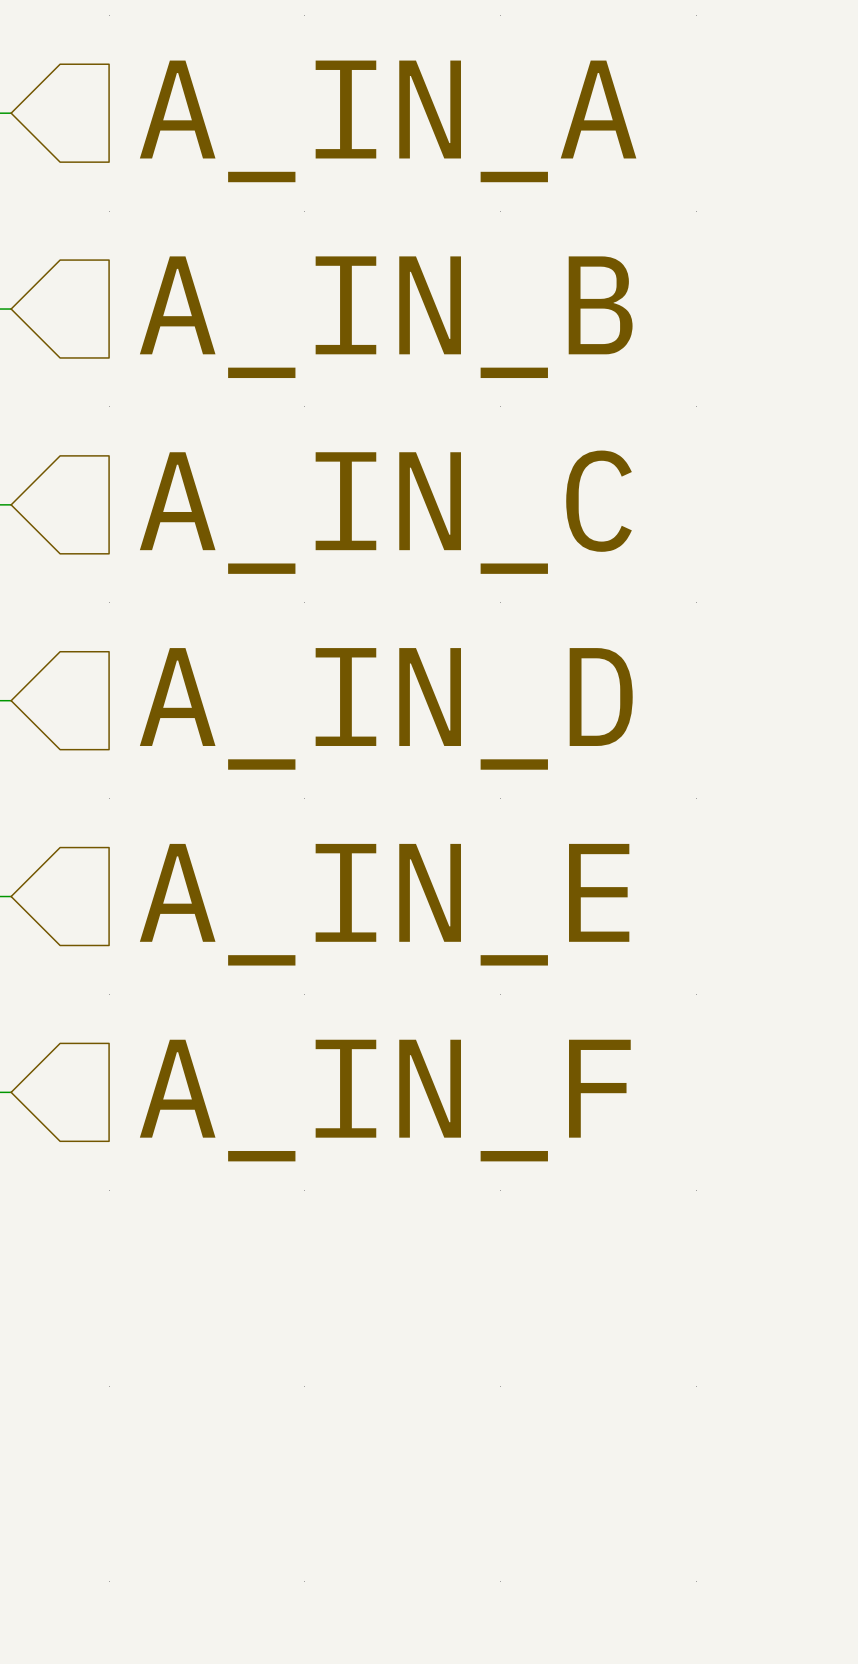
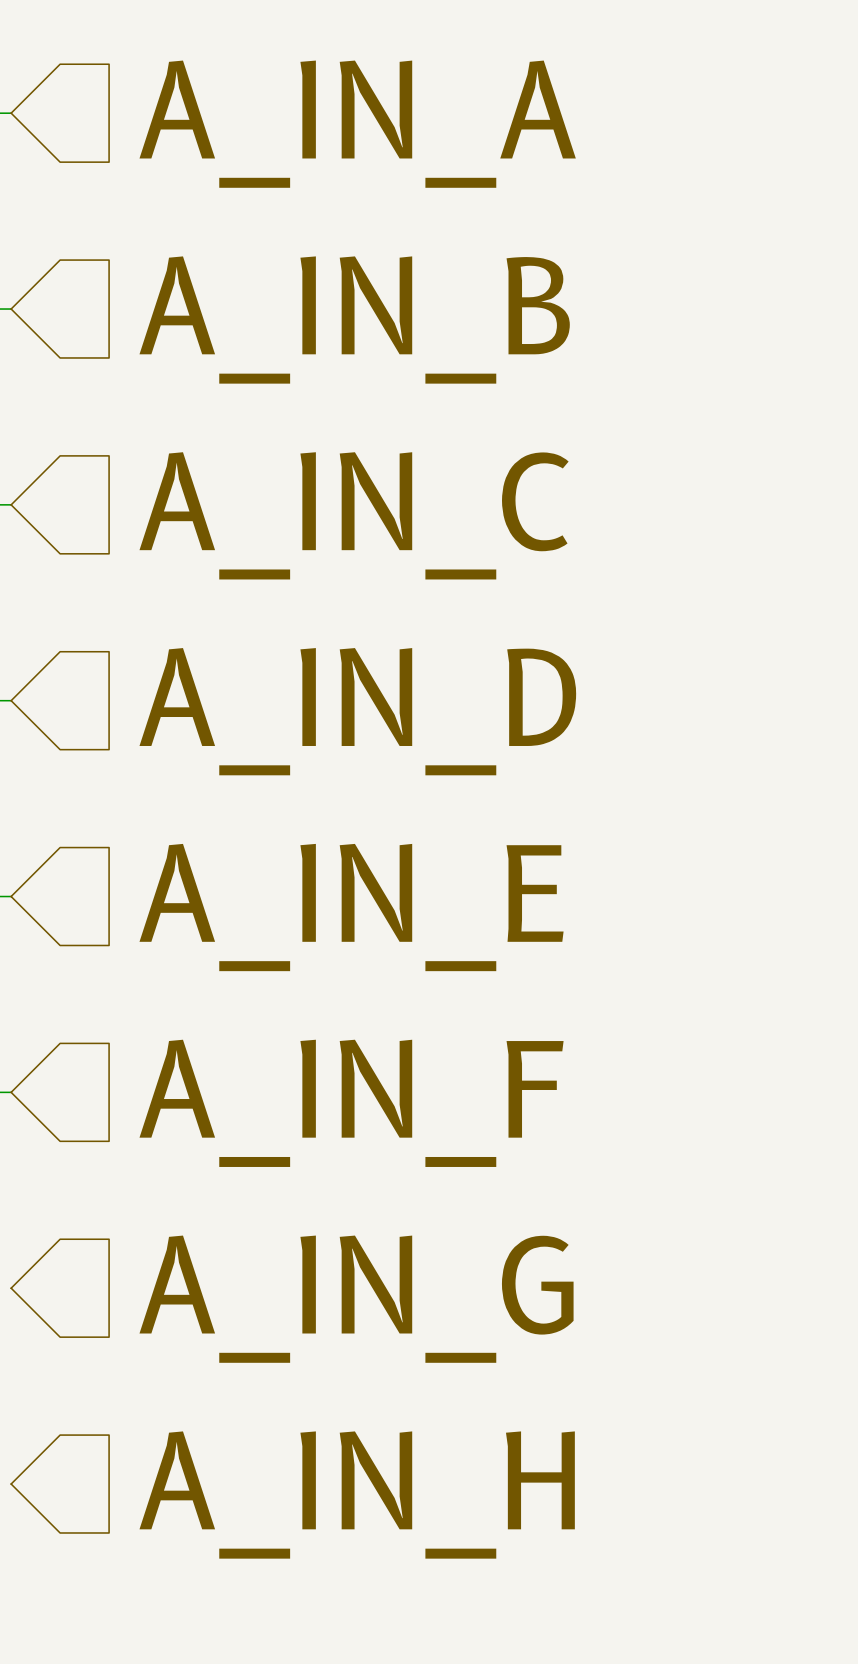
hierarchical label: none -> A_IN_G (356, 1299)
hierarchical label: none -> A_IN_H (357, 1495)

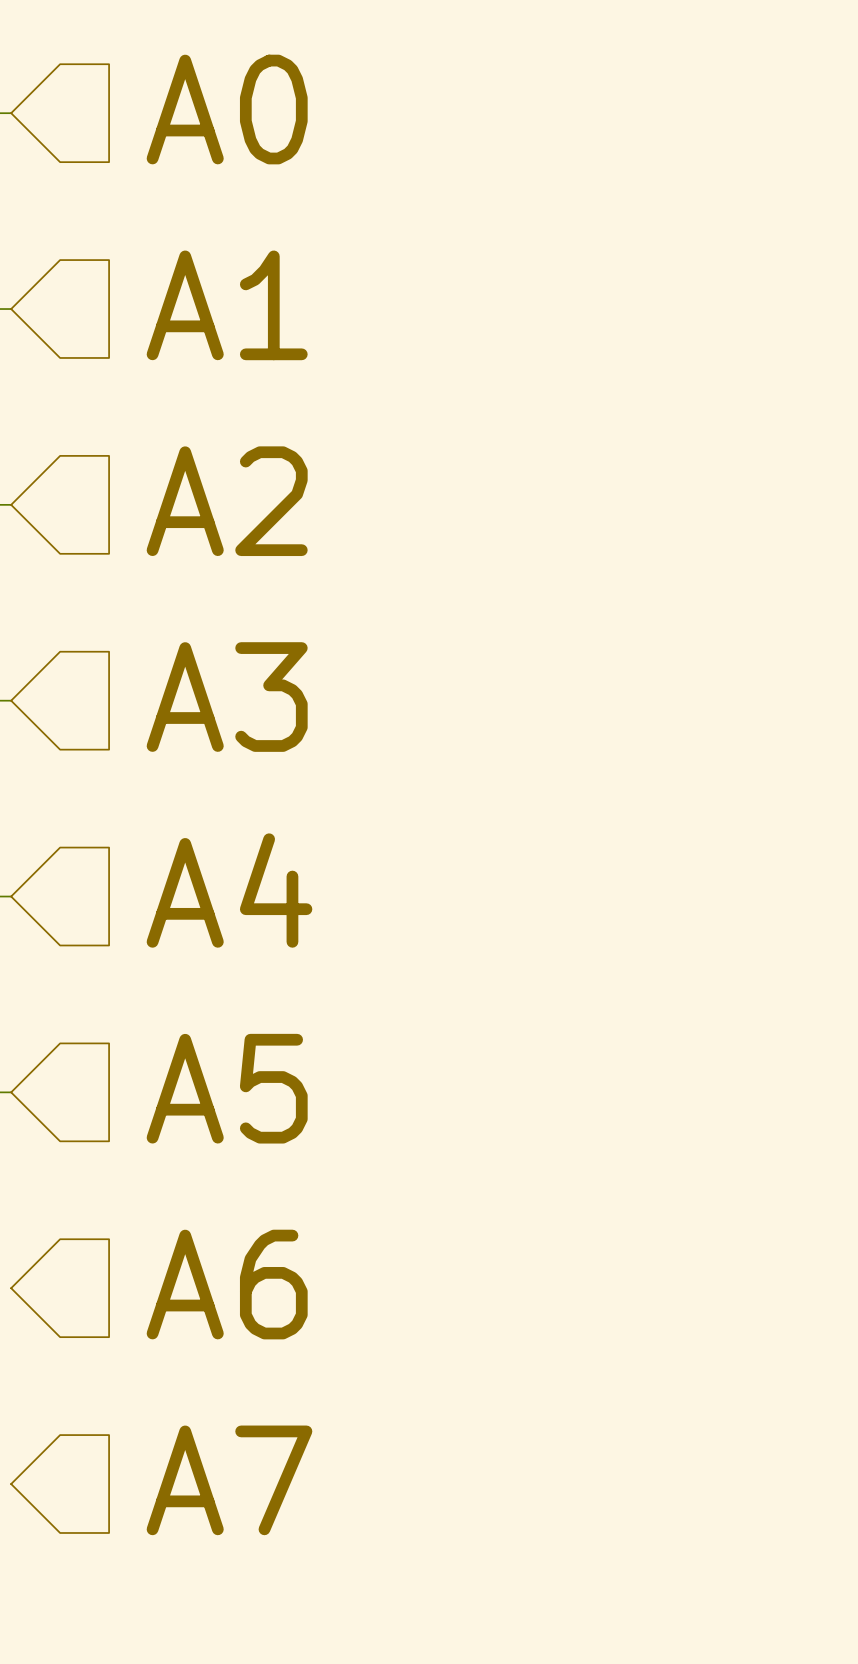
hierarchical label: A_IN_A (357, 124) -> A0 (227, 109)
hierarchical label: A_IN_B (354, 320) -> A1 (227, 305)
hierarchical label: A_IN_C (354, 515) -> A2 (227, 501)
hierarchical label: A_IN_D (357, 711) -> A3 (227, 697)
hierarchical label: A_IN_E (351, 907) -> A4 (229, 890)
hierarchical label: A_IN_F (351, 1103) -> A5 (227, 1088)
hierarchical label: A_IN_G (356, 1299) -> A6 (227, 1284)
hierarchical label: A_IN_H (357, 1495) -> A7 (229, 1480)

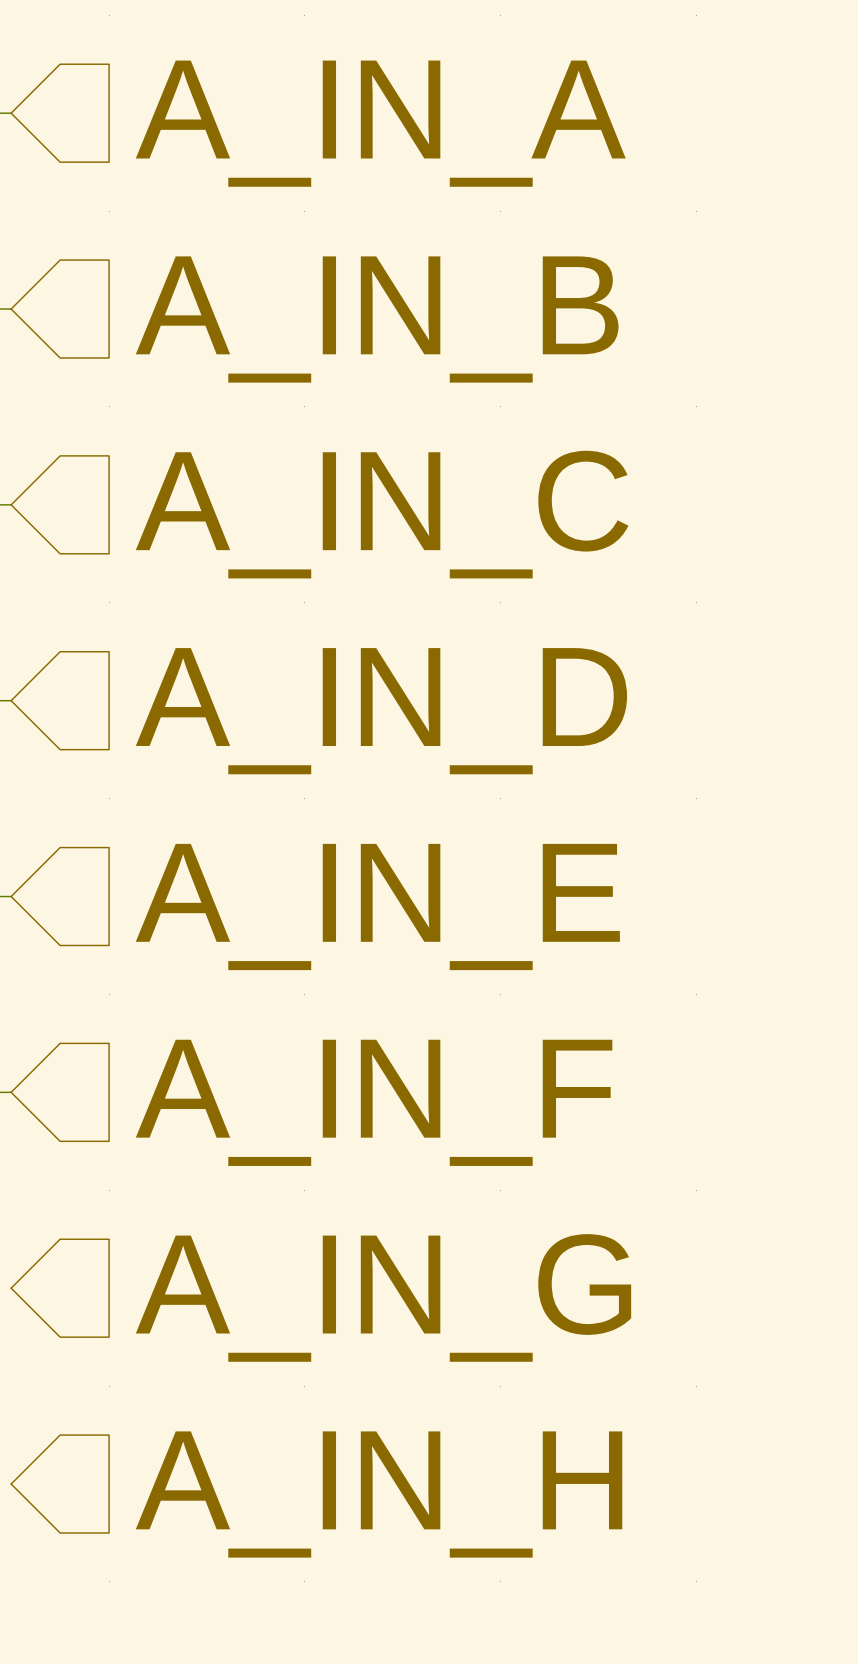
hierarchical label: A0 (227, 109) -> A_IN_A (380, 123)
hierarchical label: A1 (227, 305) -> A_IN_B (377, 319)
hierarchical label: A2 (227, 501) -> A_IN_C (382, 514)
hierarchical label: A3 (227, 697) -> A_IN_D (381, 711)
hierarchical label: A4 (229, 890) -> A_IN_E (377, 907)
hierarchical label: A5 (227, 1088) -> A_IN_F (374, 1102)
hierarchical label: A6 (227, 1284) -> A_IN_G (383, 1297)
hierarchical label: A7 (229, 1480) -> A_IN_H (379, 1494)

